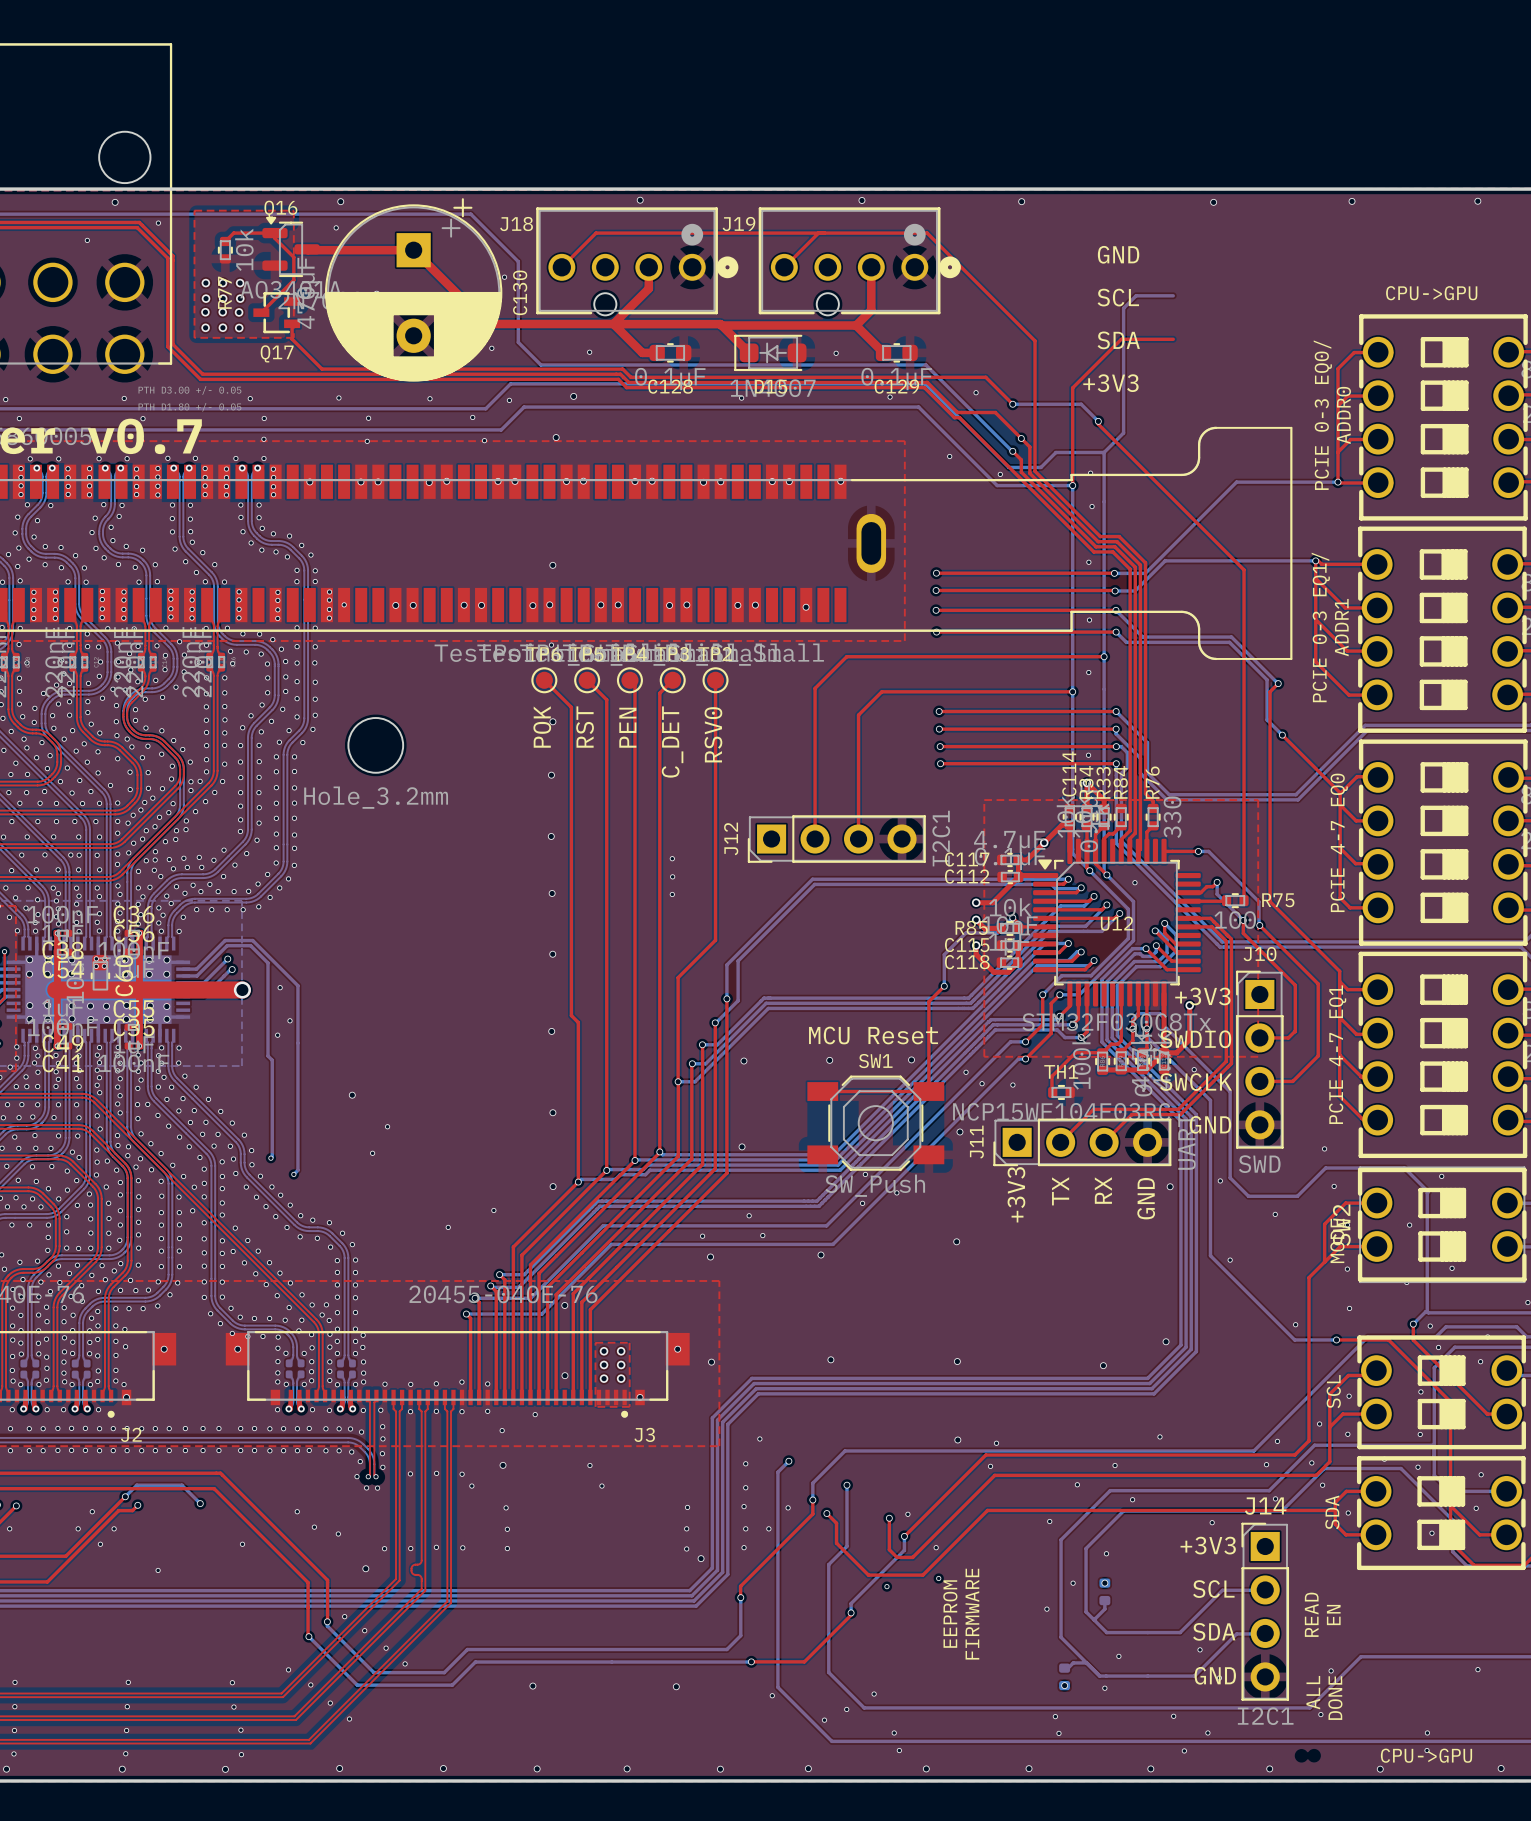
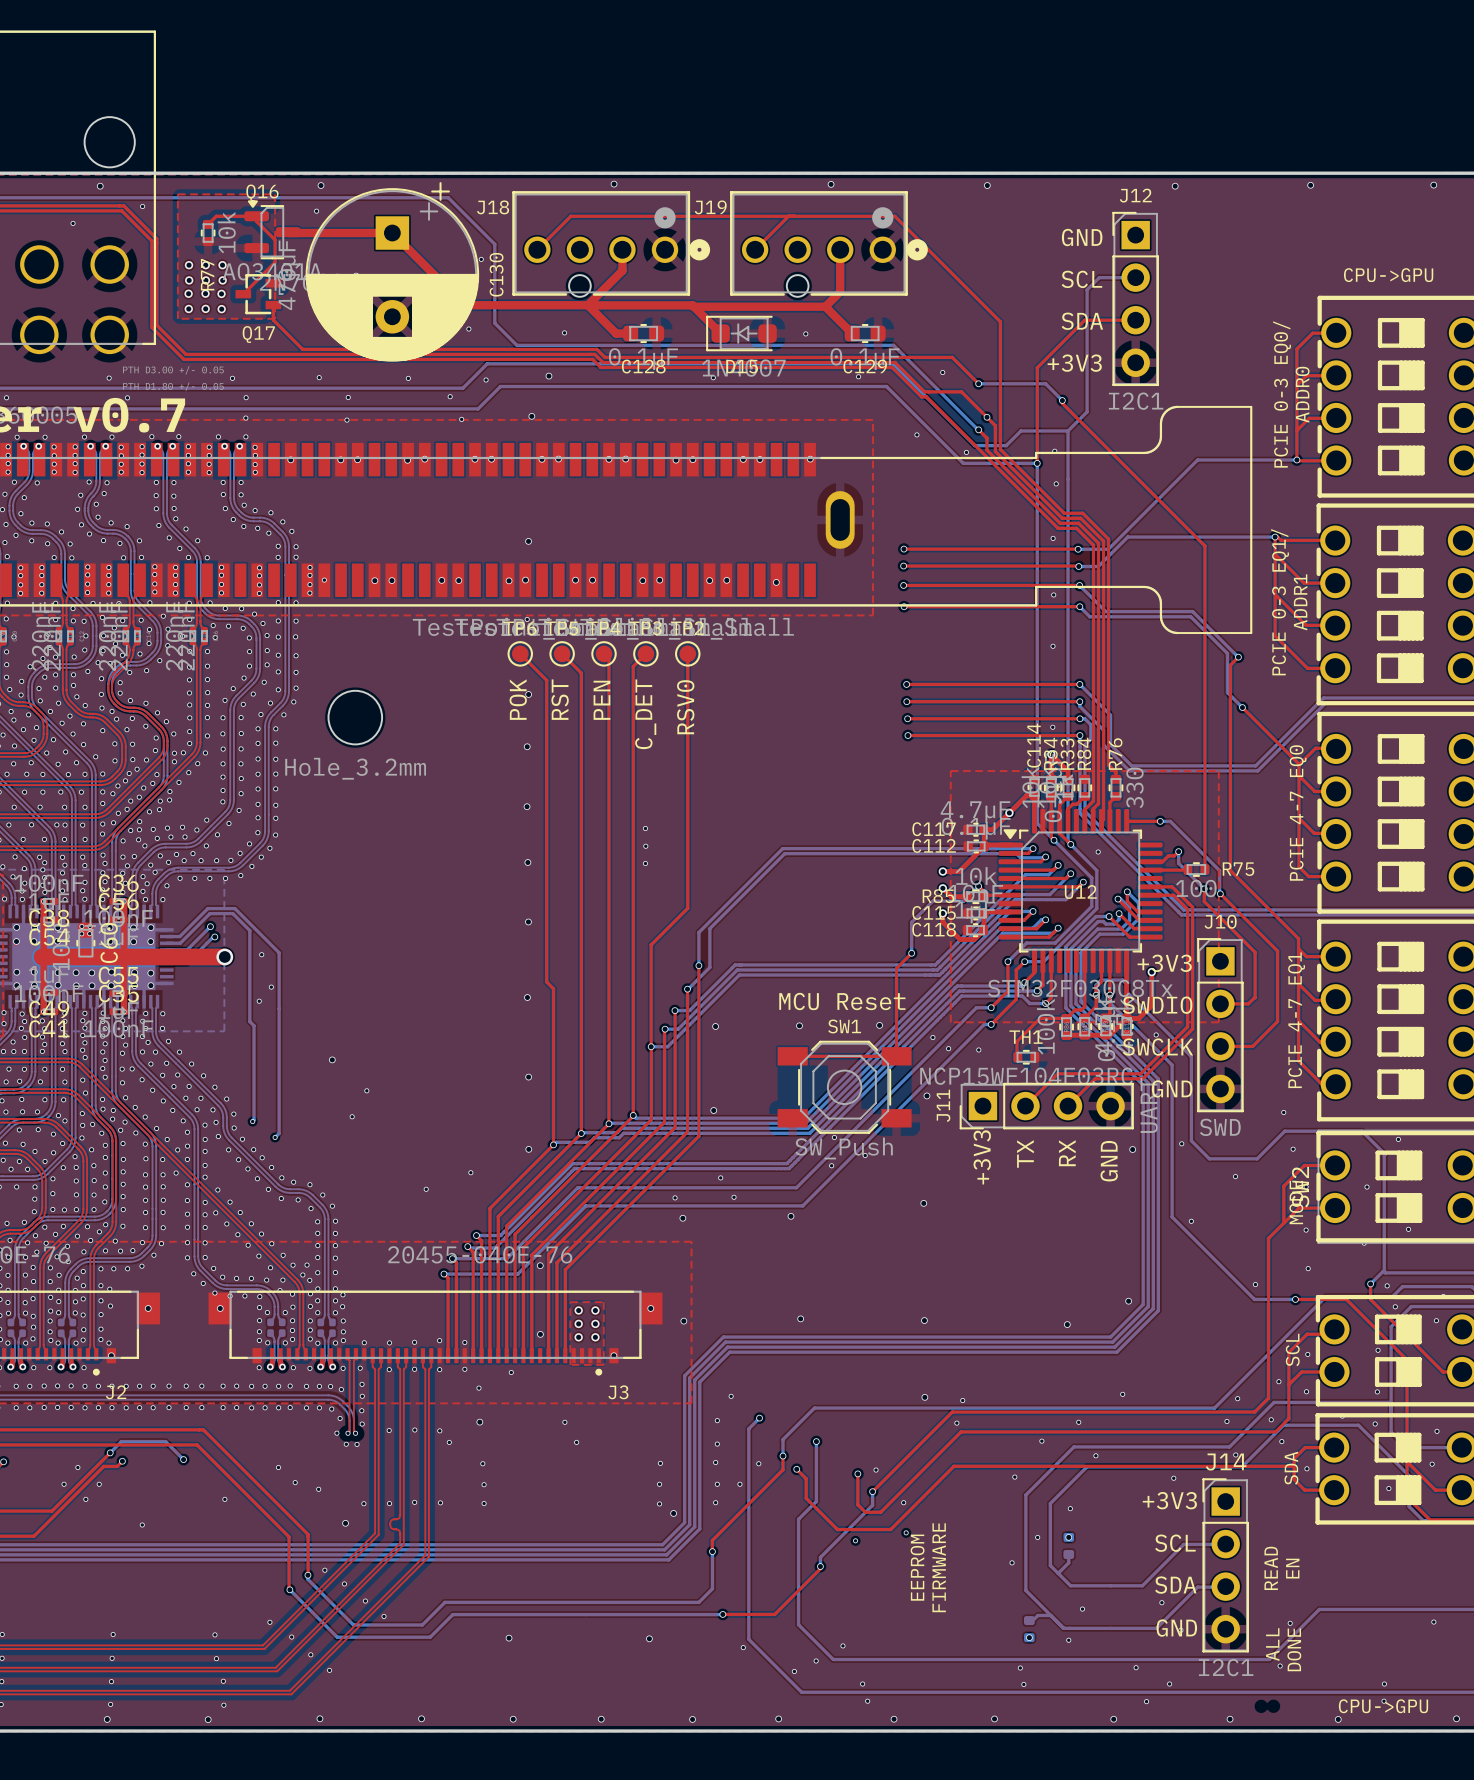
top track: (1104, 656) (846, 656) (815, 688) (815, 839) -> none
via: (1104, 656) -> none
top track: (1072, 691) (881, 691) (858, 715) (858, 839) -> none
via: (1072, 691) -> none
J12 rotation: 0° (836, 839) -> 90° clockwise (1135, 298)
J12 position: (836, 839) -> (1135, 298)

